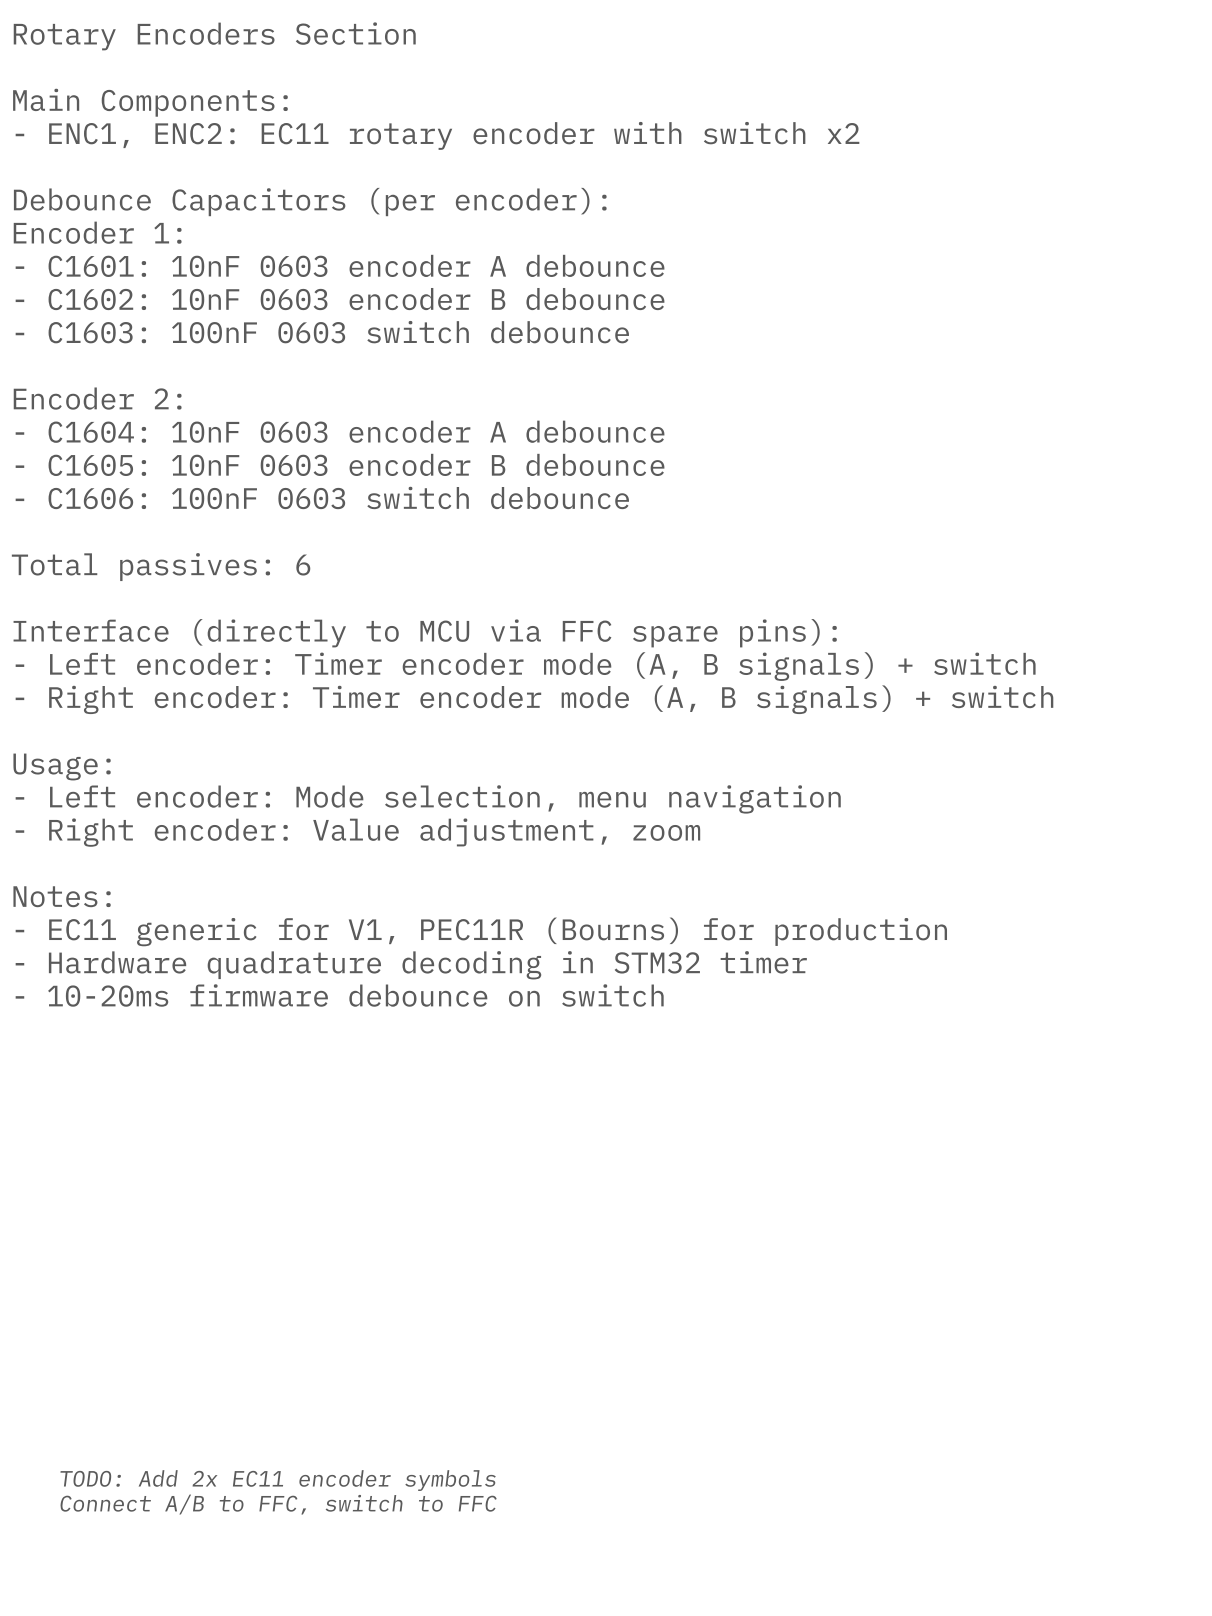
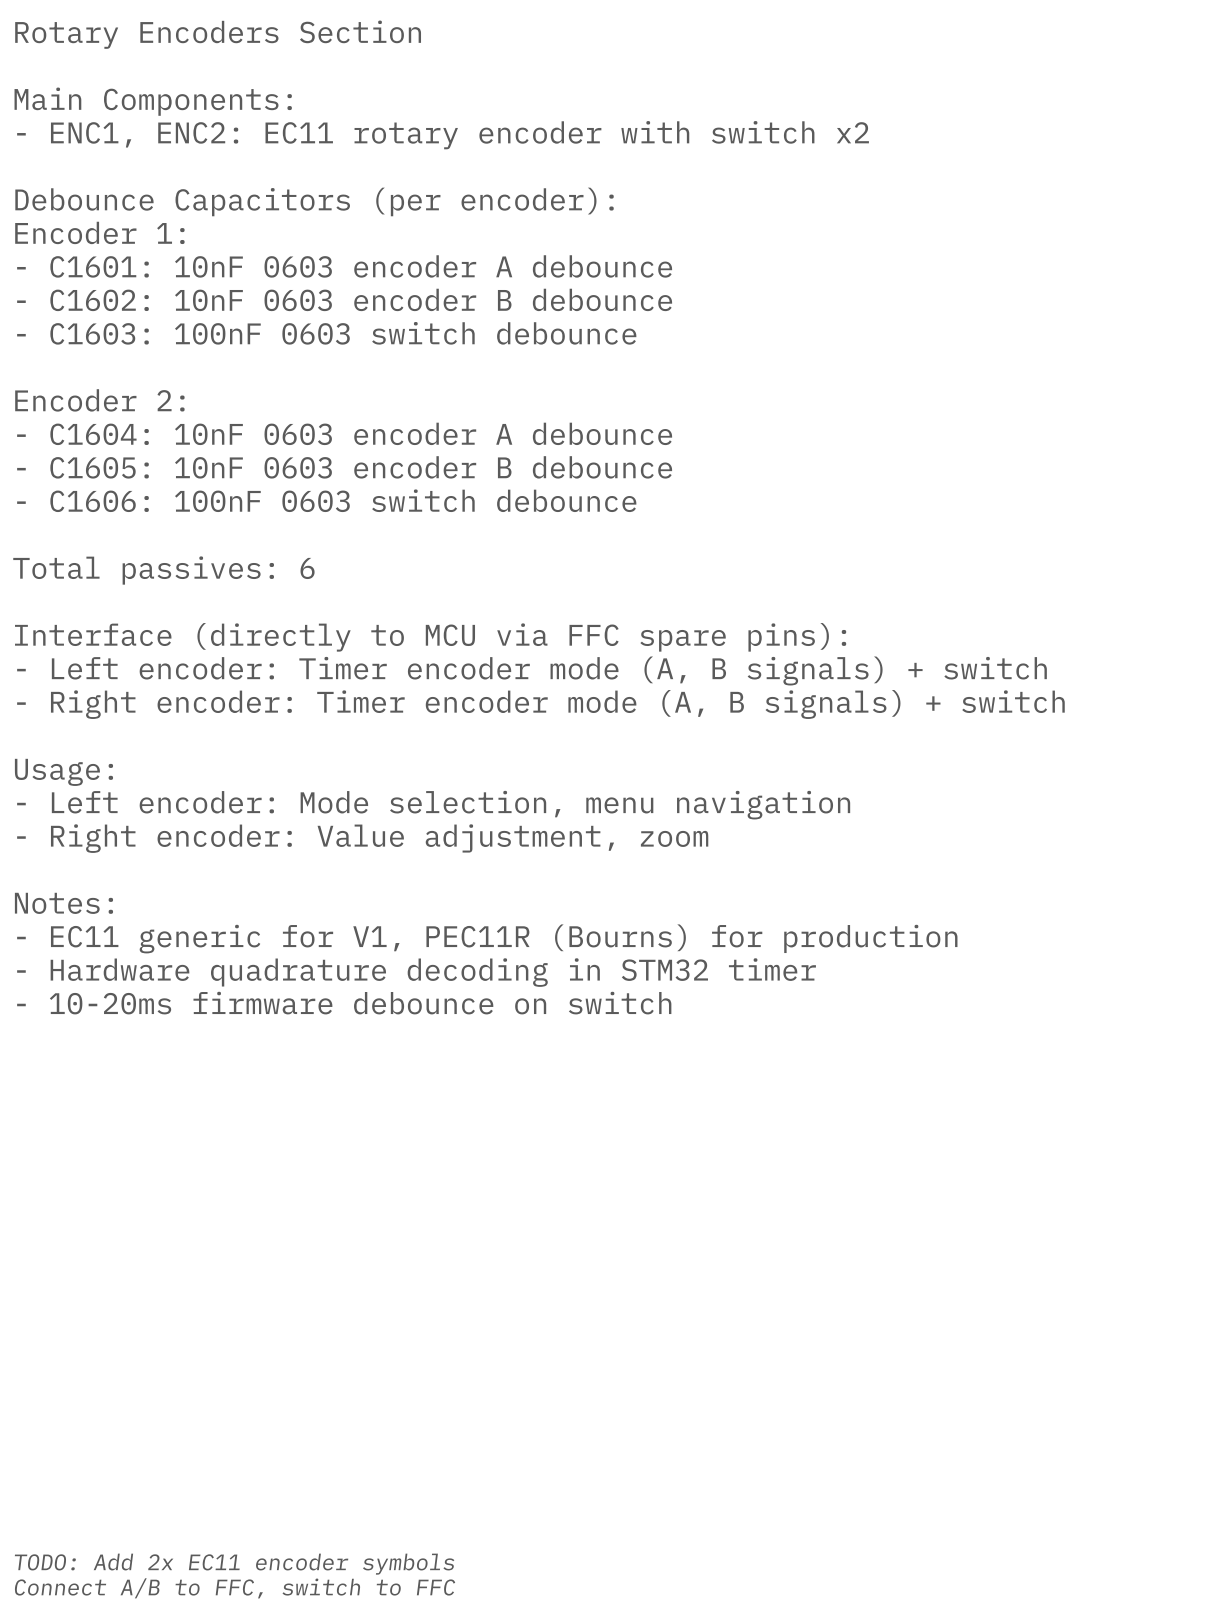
text position: TODO: Add 2x EC11 encoder symbols (278, 1480) -> TODO: Add 2x EC11 encoder symbols (234, 1564)
text position: Connect A/B to FFC, switch to FFC (278, 1504) -> Connect A/B to FFC, switch to FFC (234, 1588)

